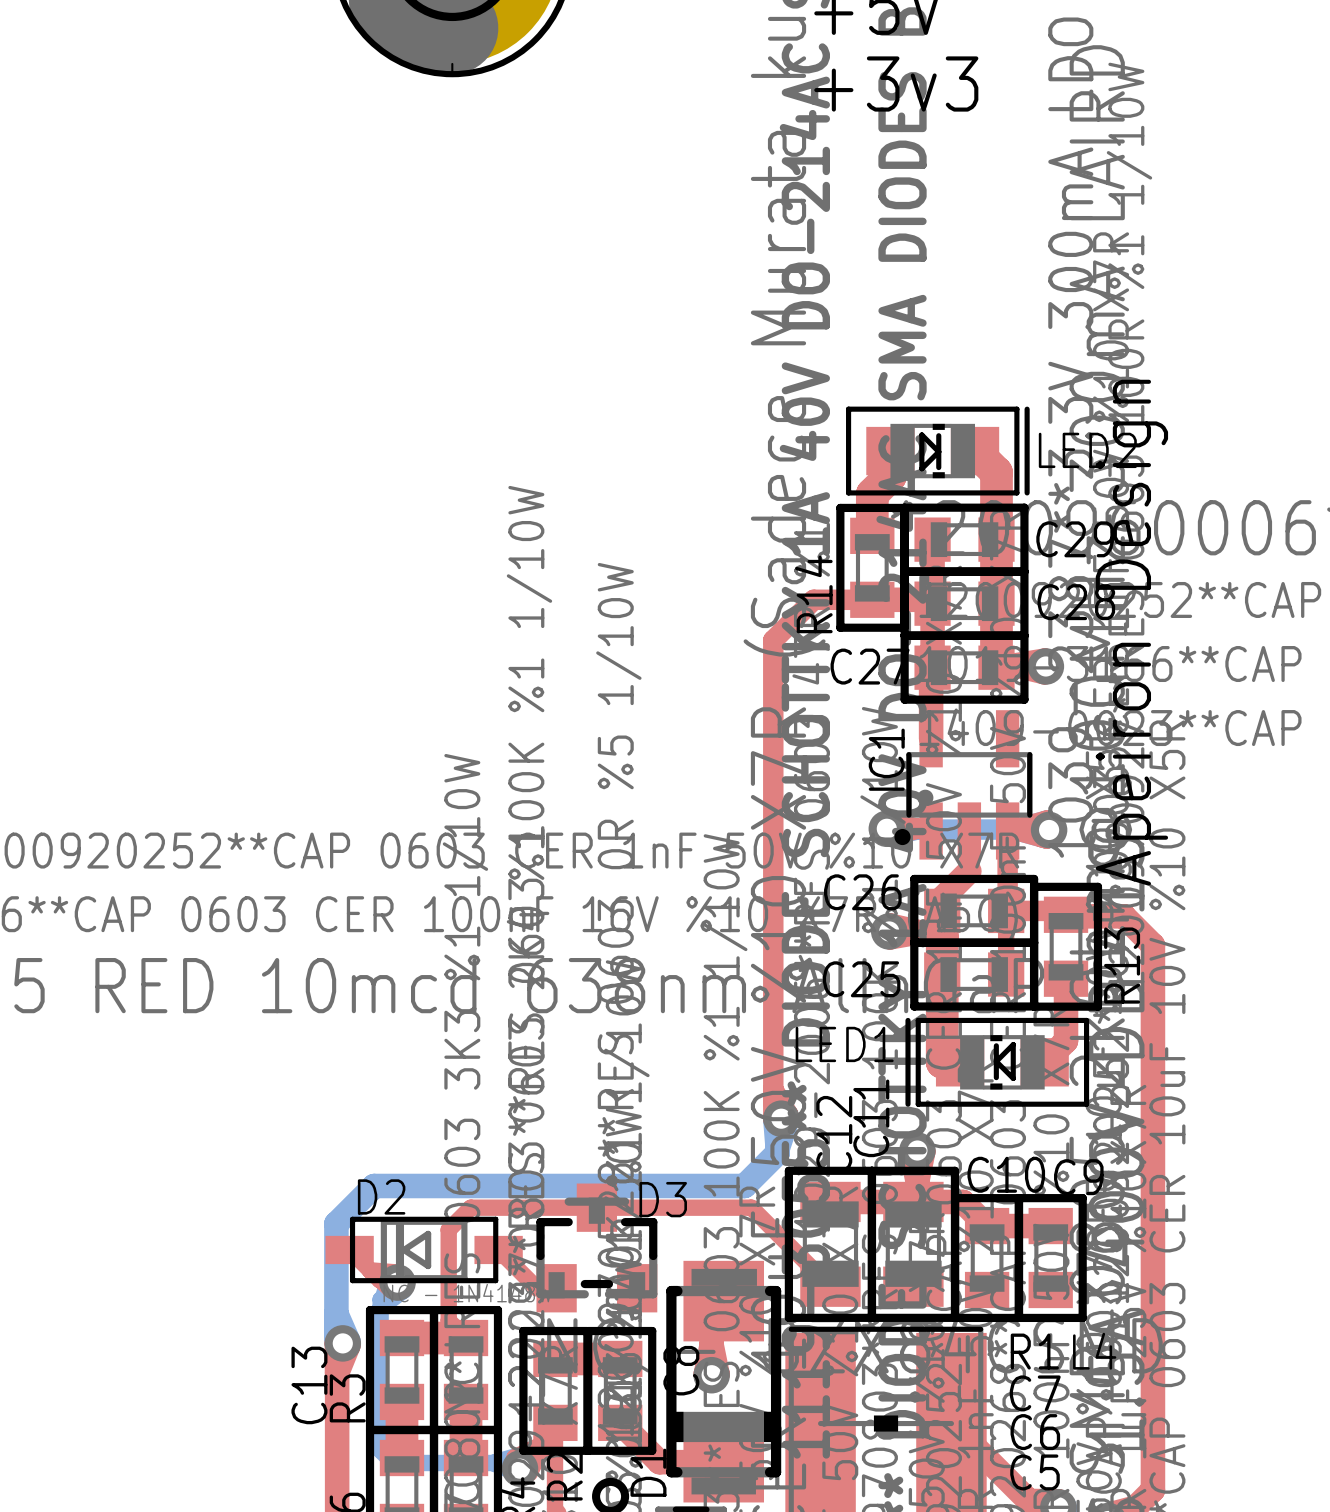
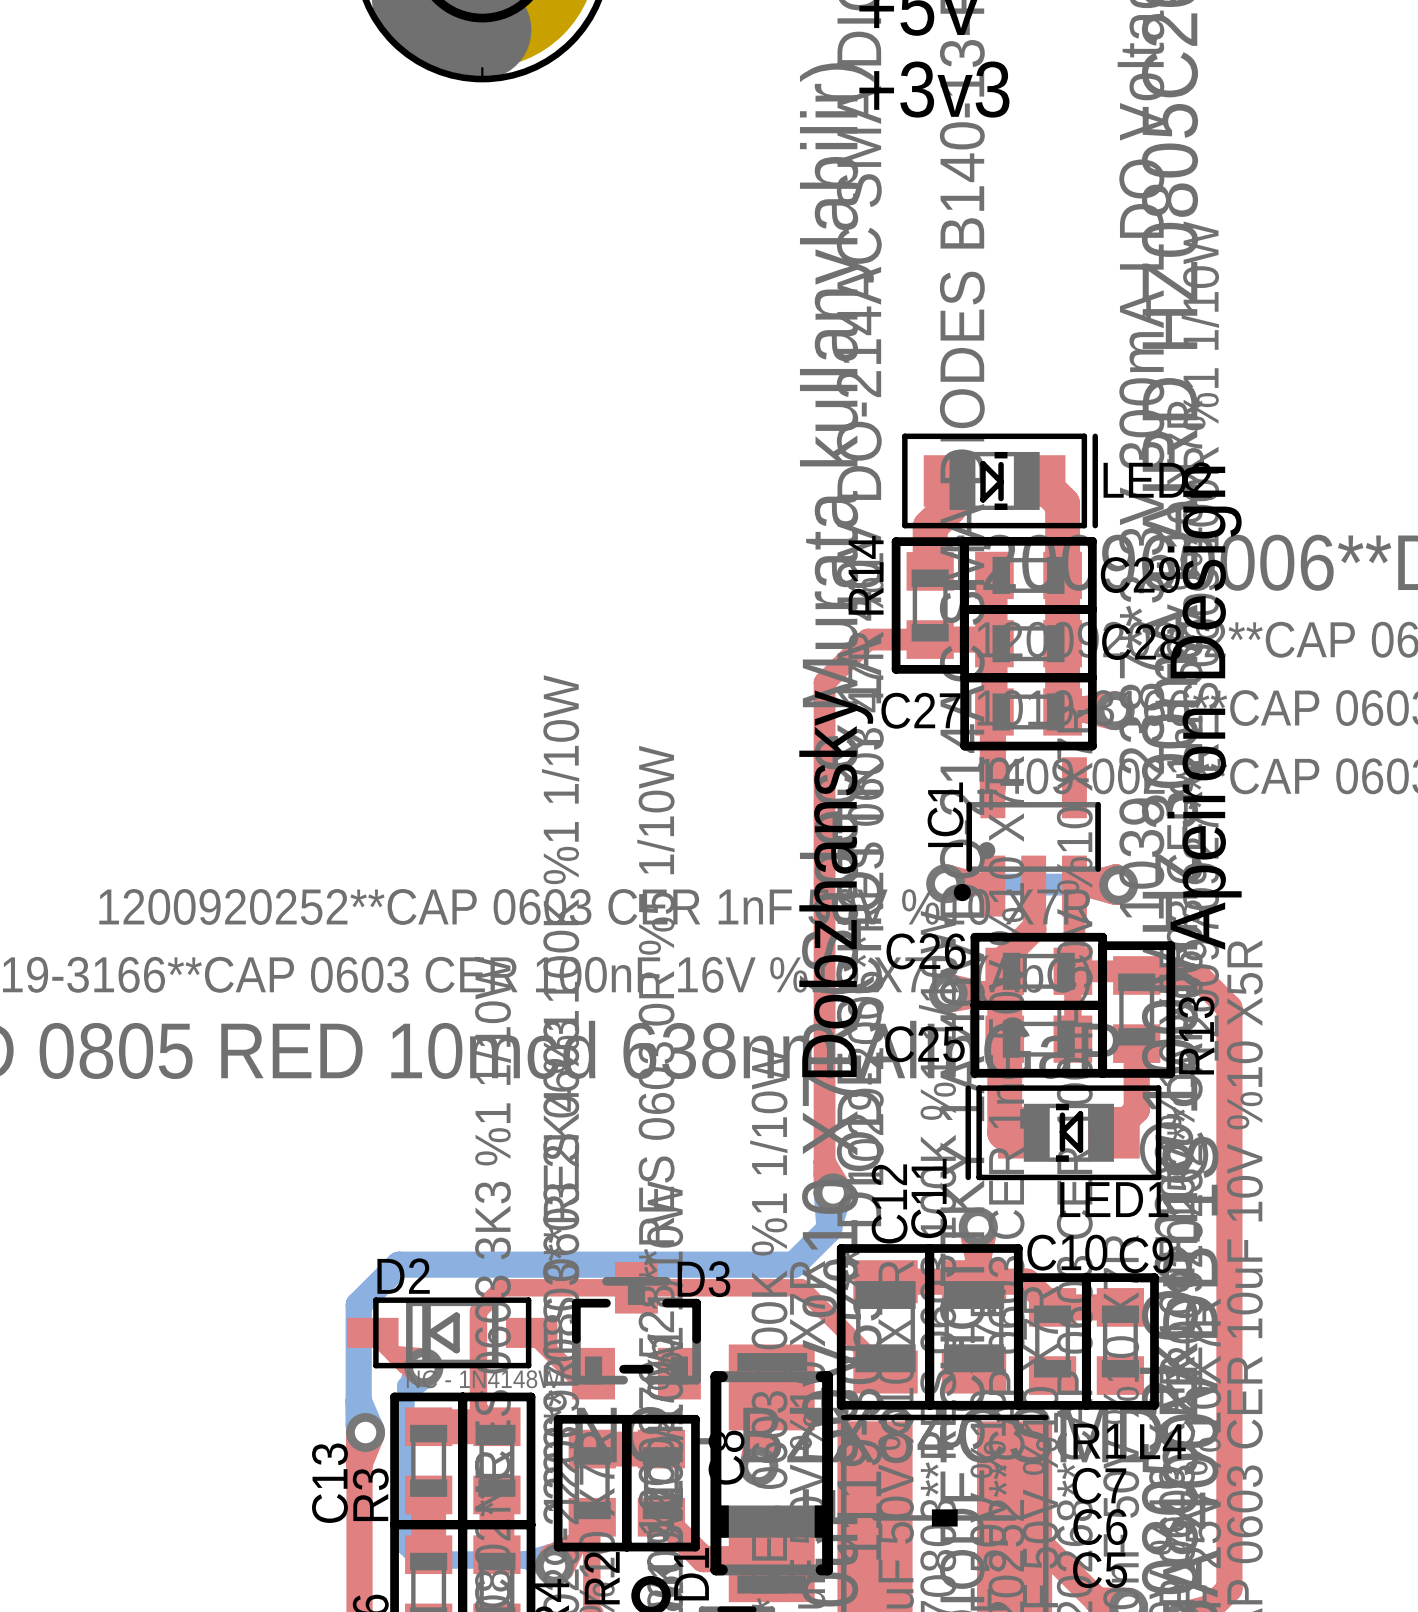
R14 name position: R14 (813, 594) -> R14 (866, 575)
text: none -> Dobzhansky (836, 883)
LED1 name position: LED1 (844, 1044) -> LED1 (1114, 1199)

